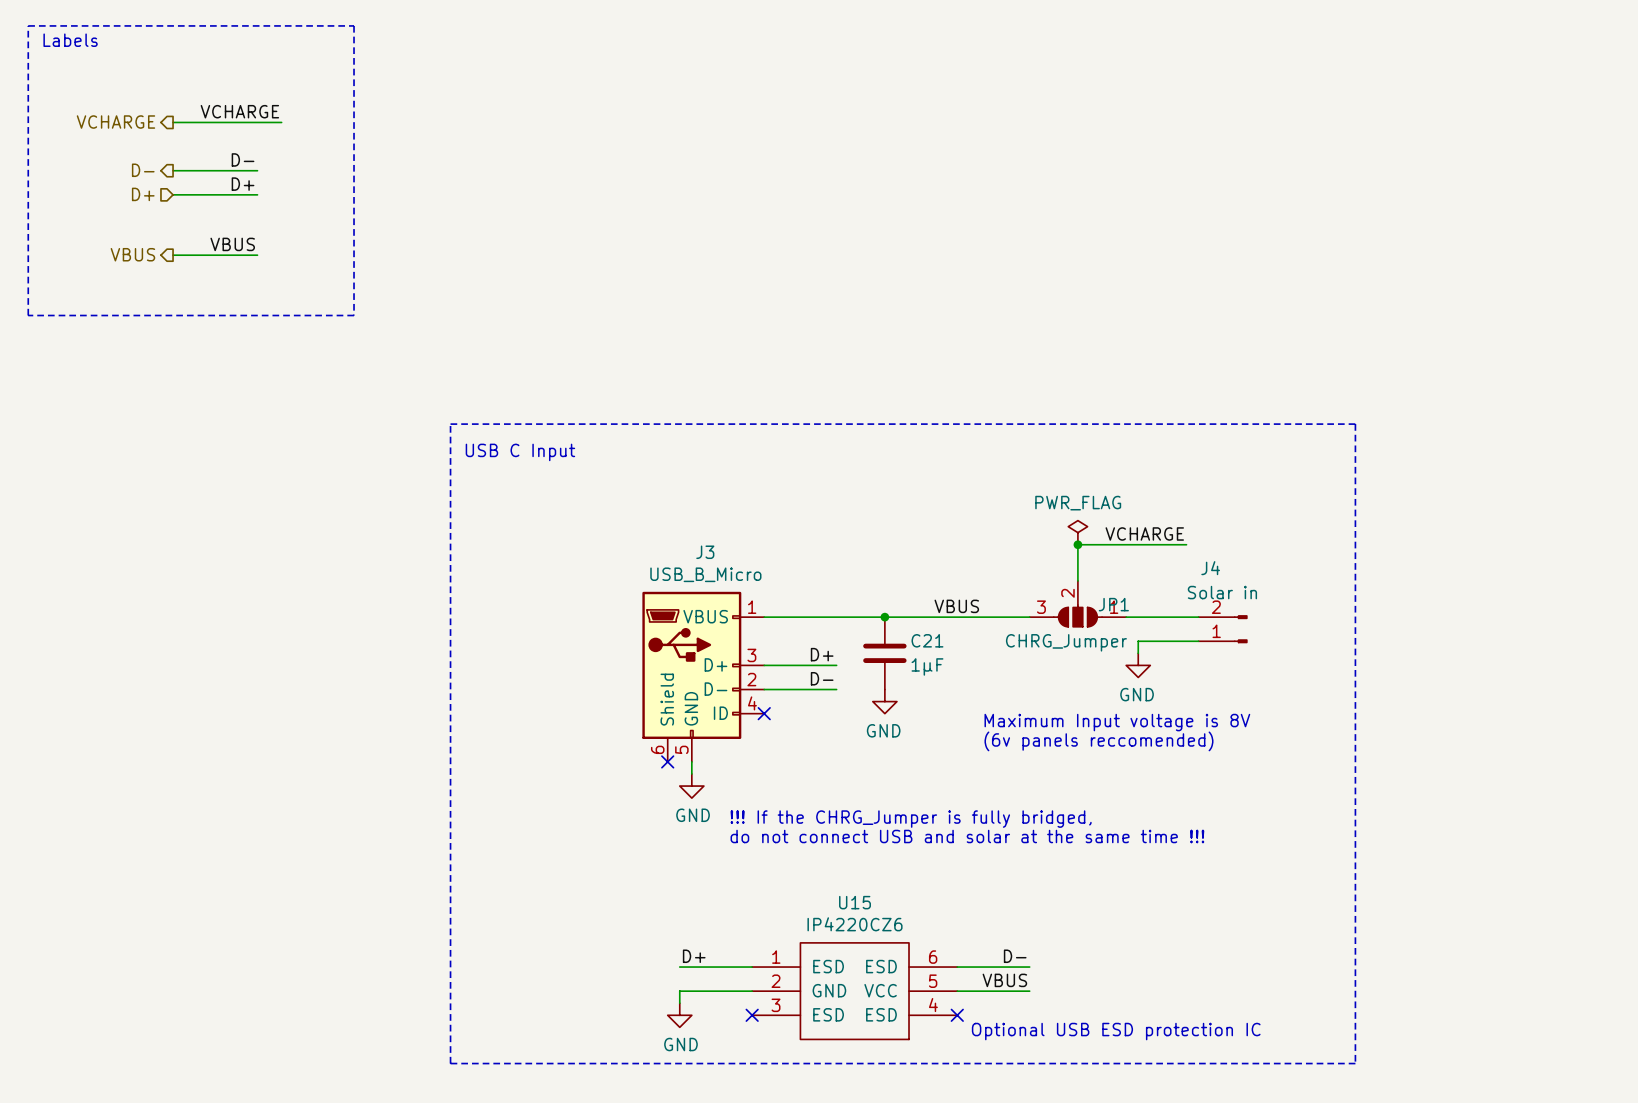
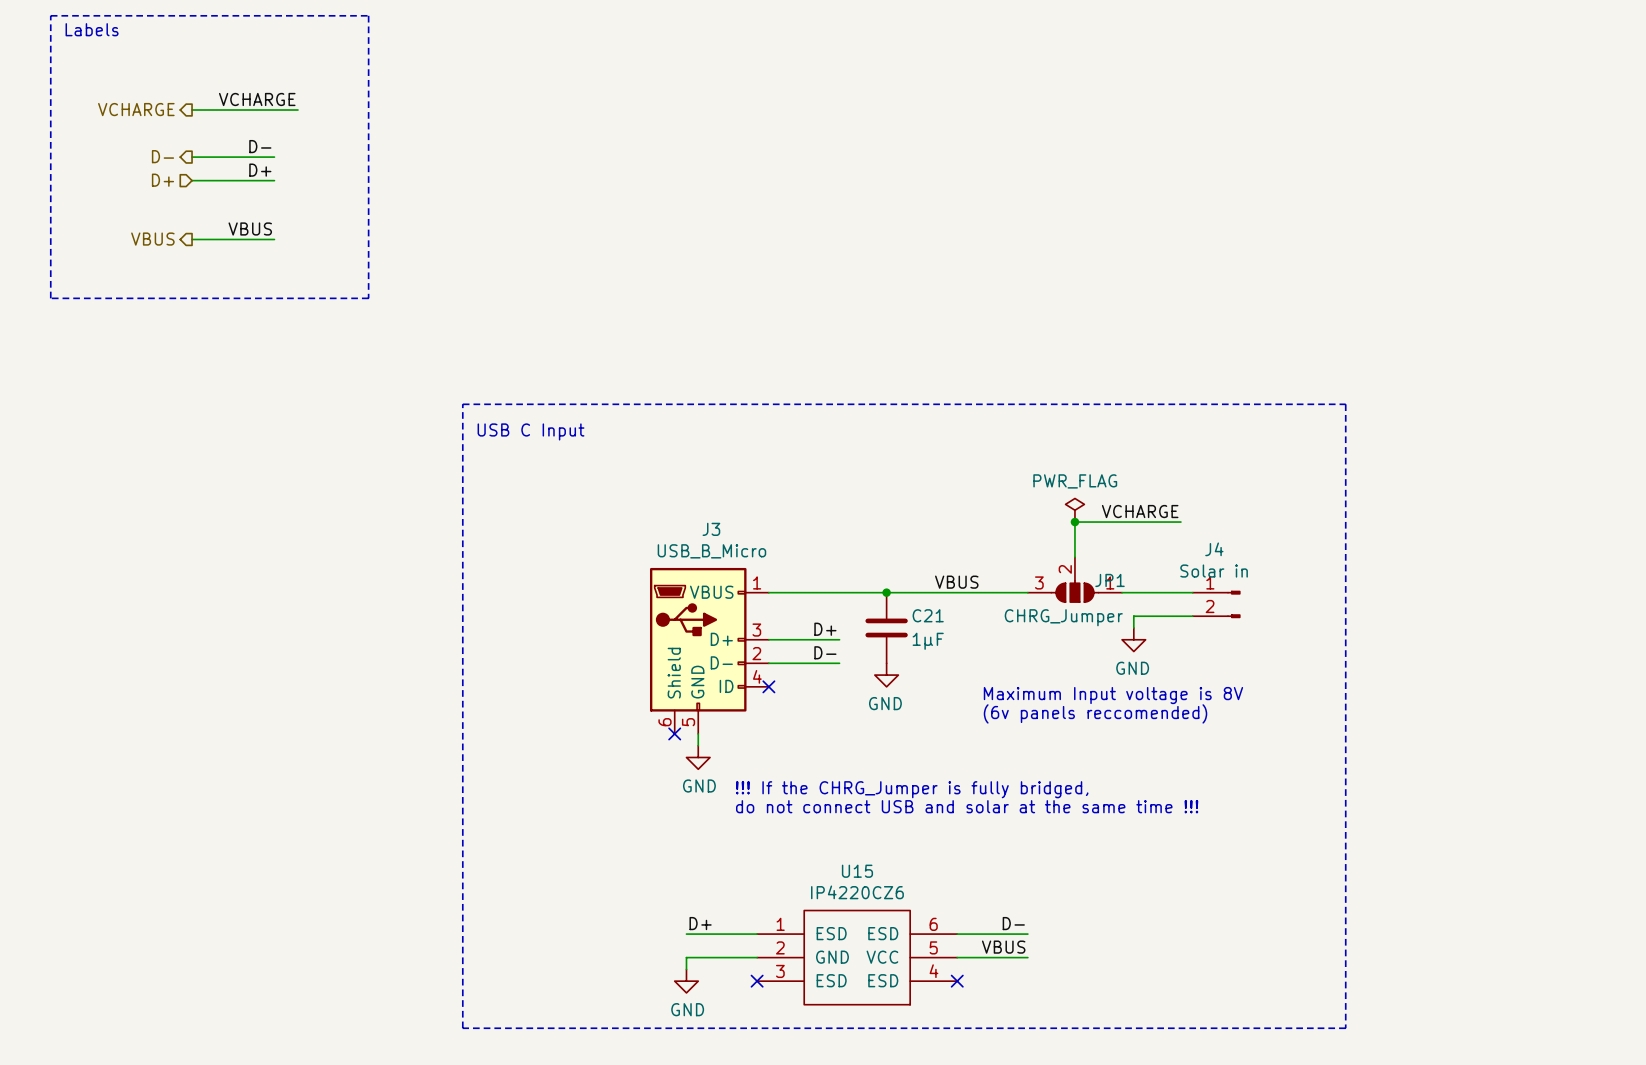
J4 flip: as is (1240, 629) -> up-down (1233, 604)
text: Optional USB ESD protection IC (1116, 1031) -> none

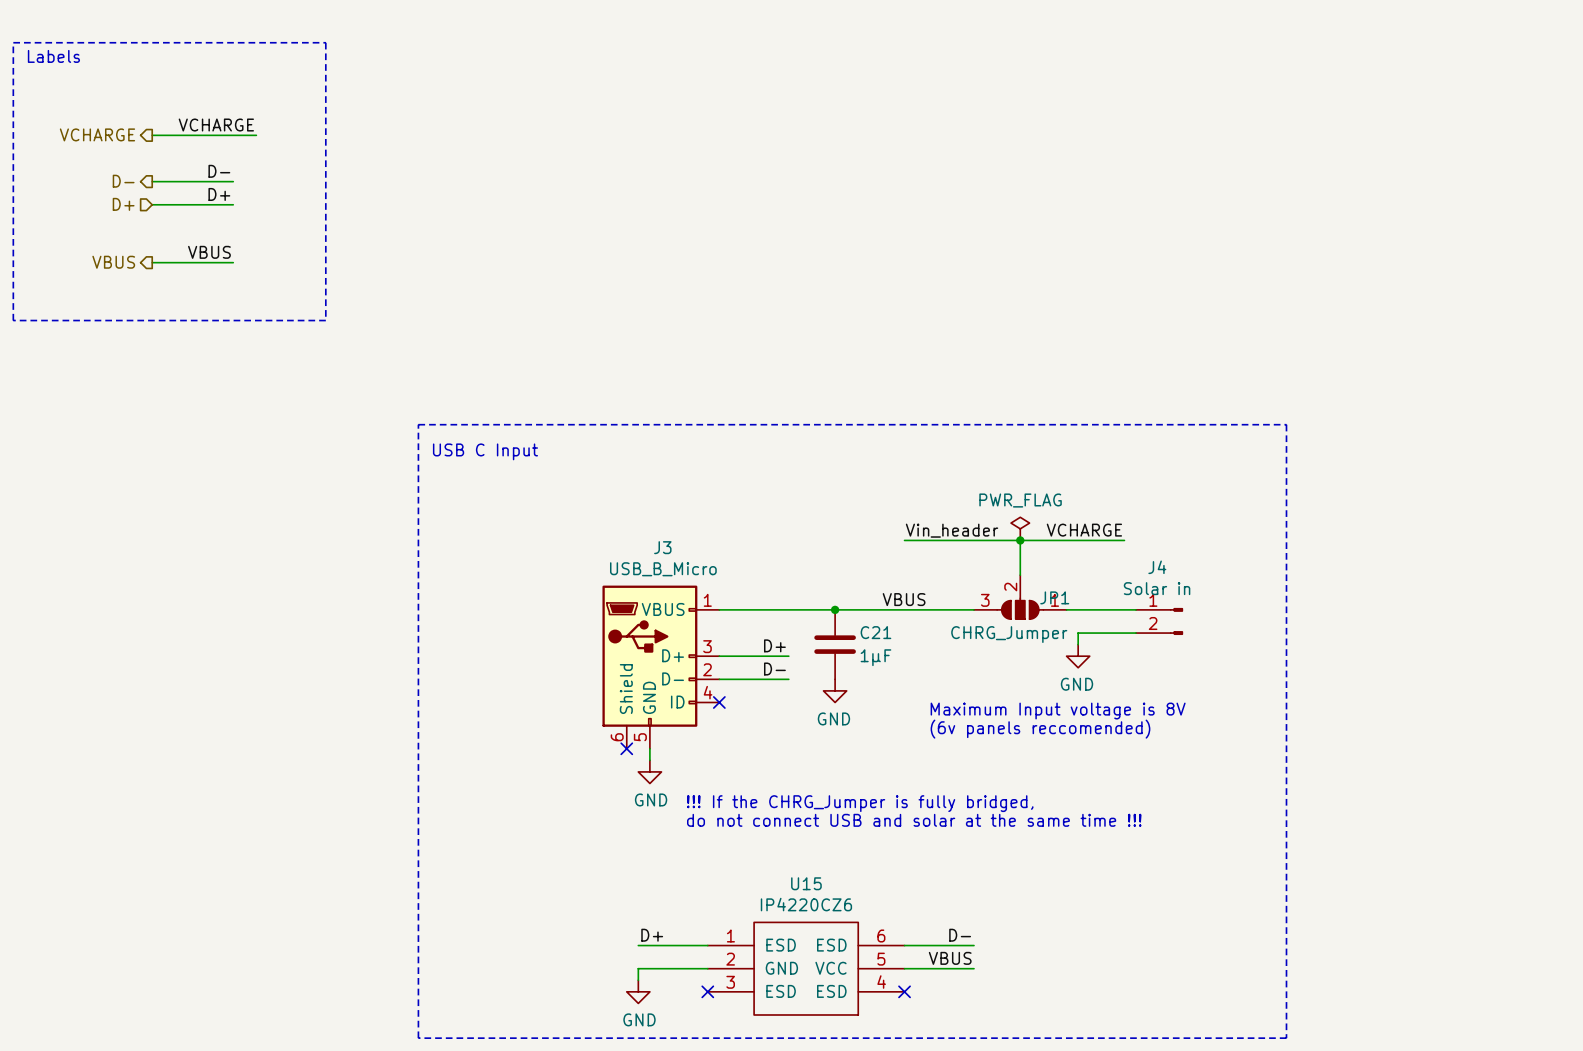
label: none -> Vin_header (952, 530)
wire: none -> (904, 540) (1020, 540)

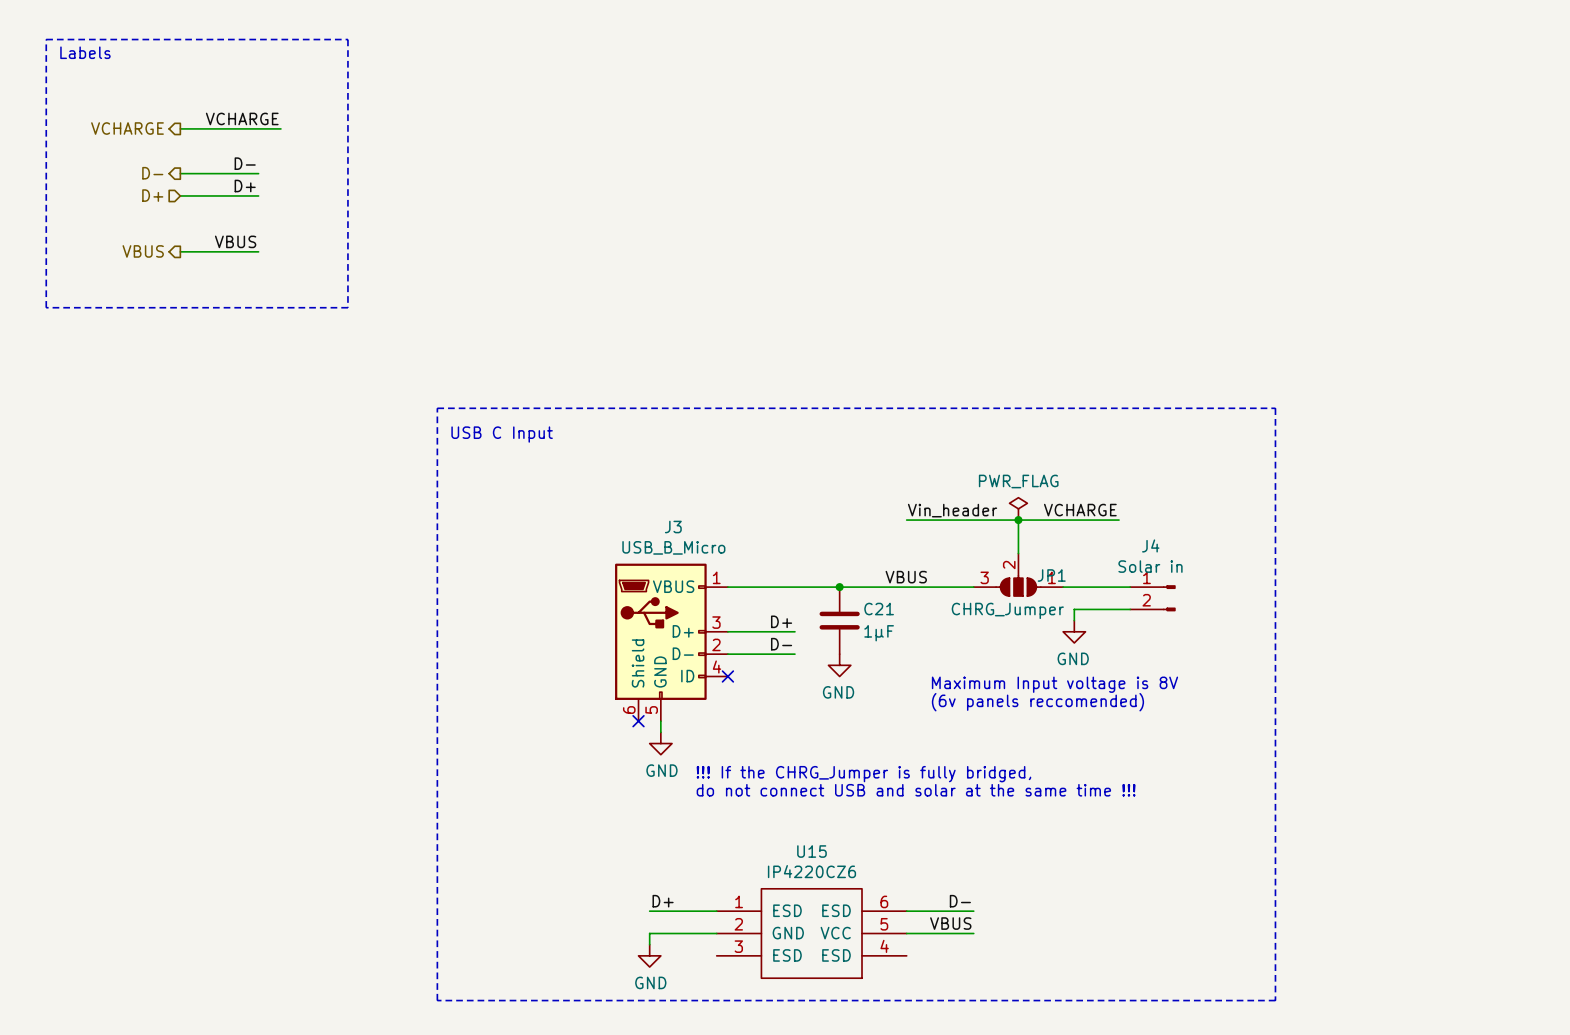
no-connect mark: (707, 991) -> none
no-connect mark: (904, 991) -> none

